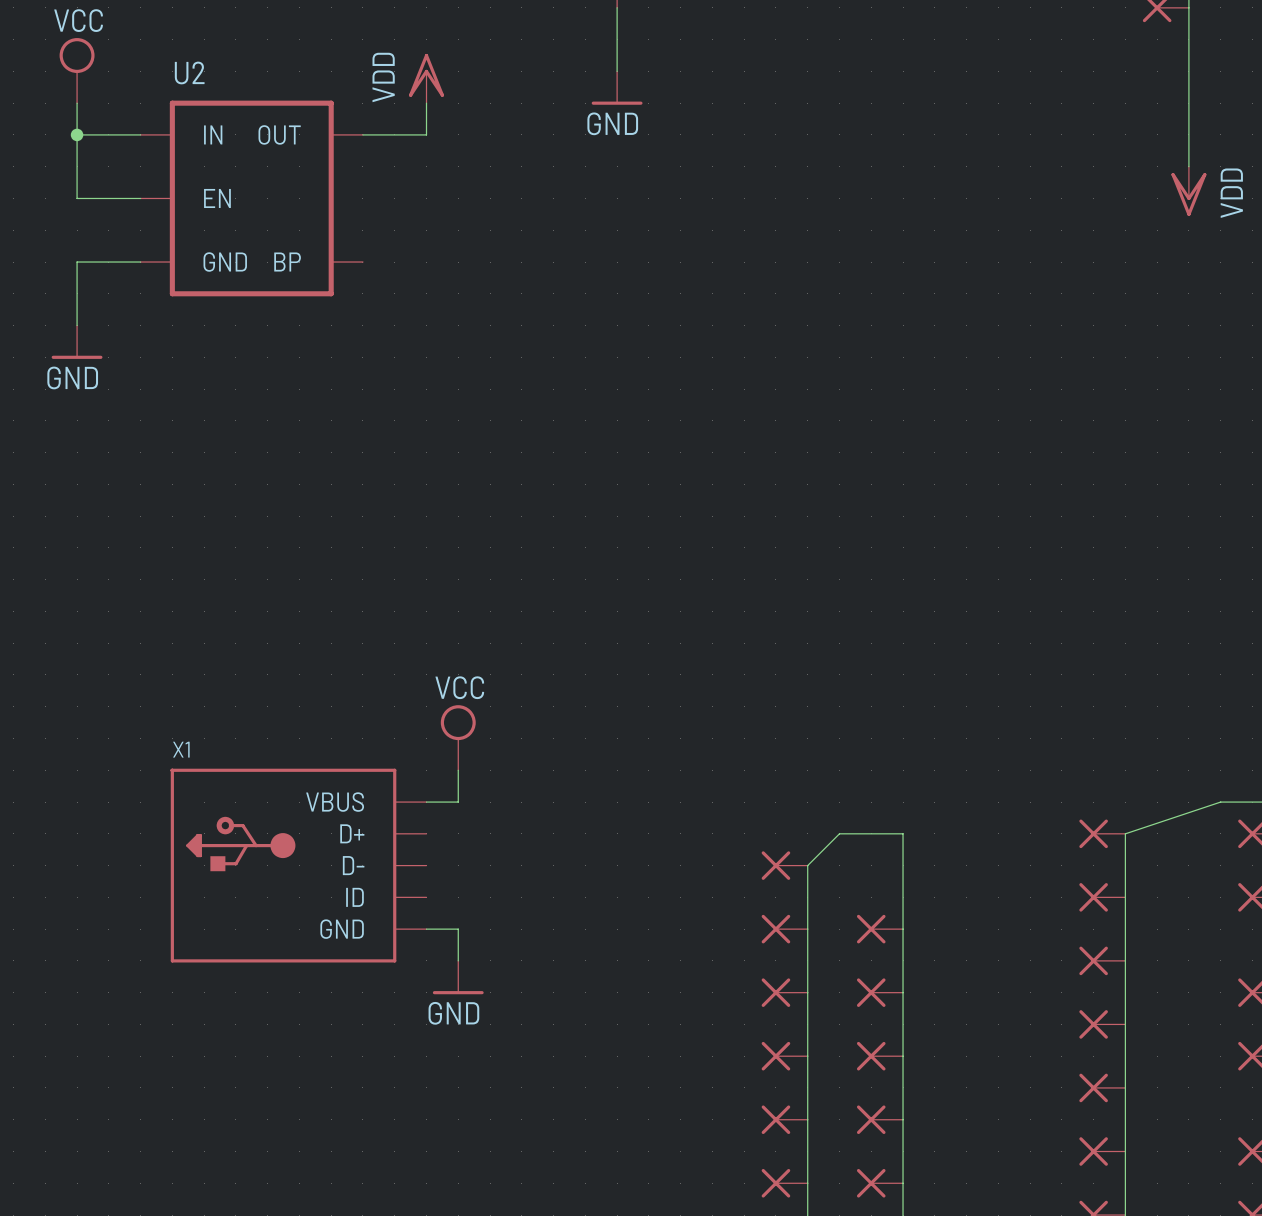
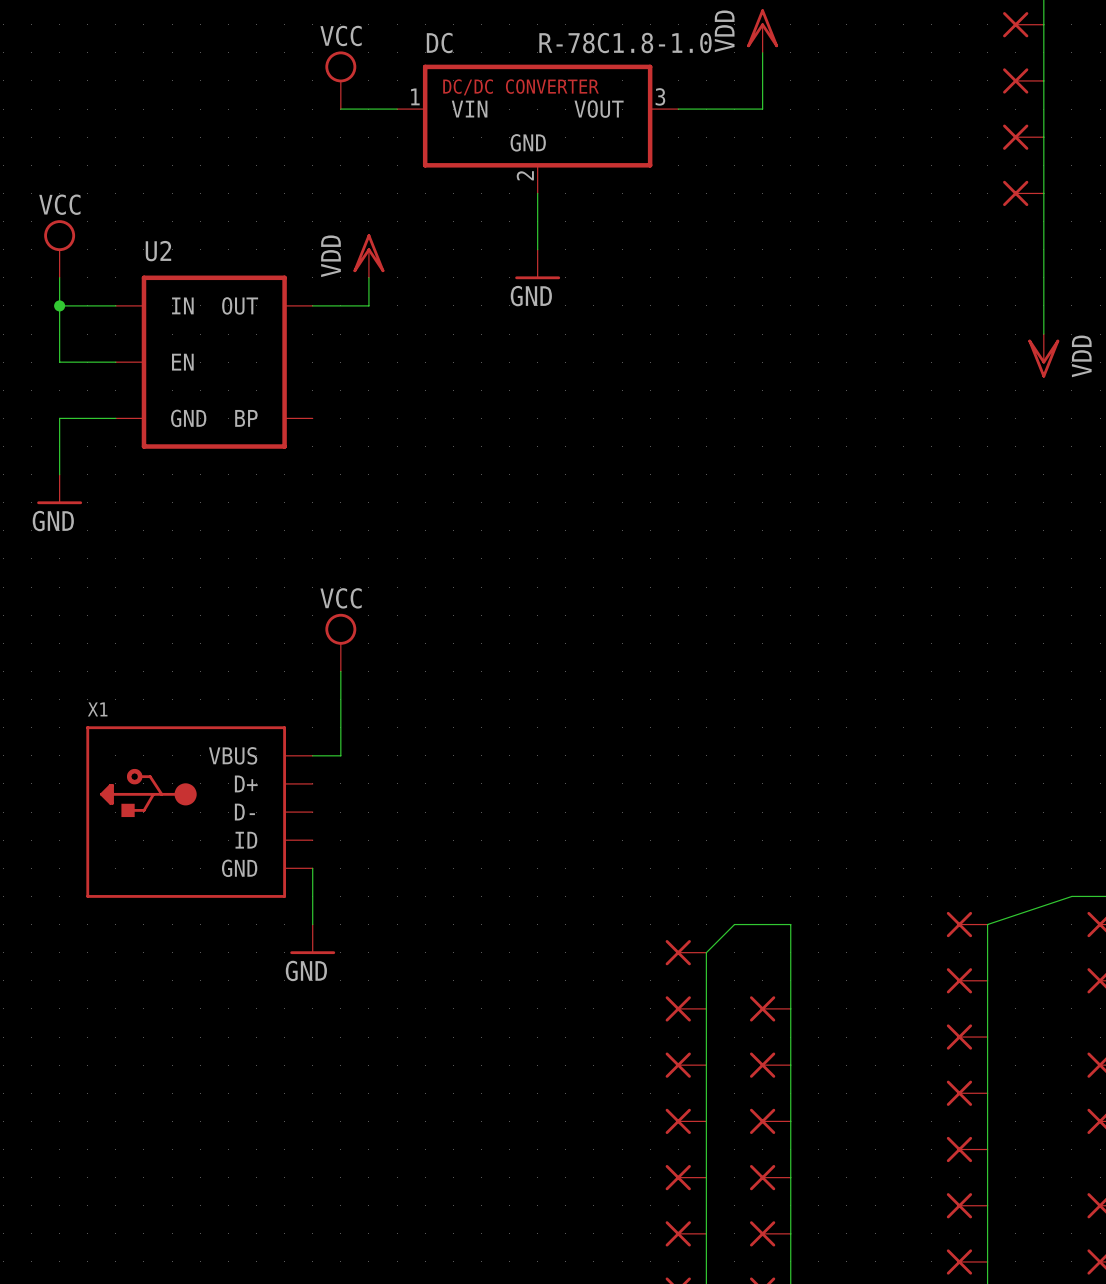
wire: none -> (340, 671) (340, 755) (312, 755)
power symbol position: VCC (458, 737) -> VCC (340, 642)
wire: none -> (312, 868) (312, 924)
wire: (458, 770) (458, 802) (426, 802) -> none
X1 position: (298, 865) -> (199, 812)
wire: (426, 929) (458, 929) (458, 960) -> none
power symbol position: GND (458, 977) -> GND (312, 939)

